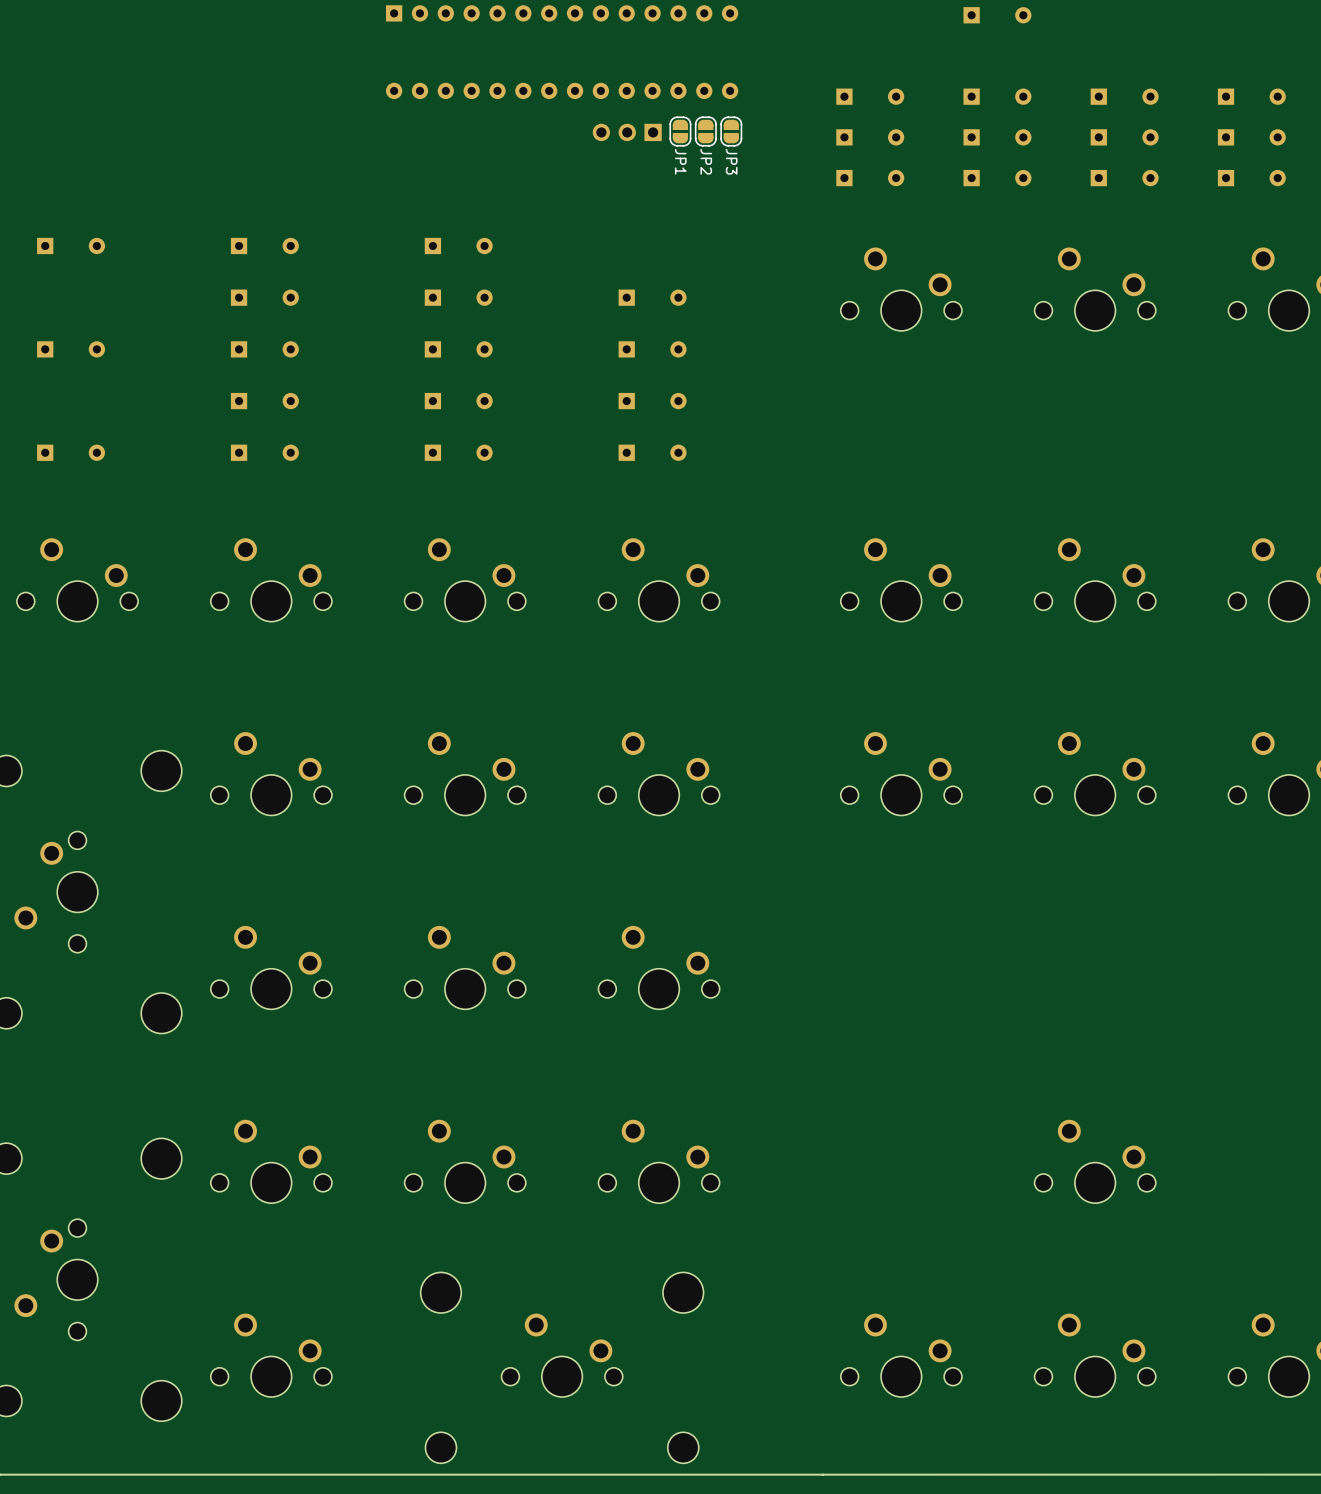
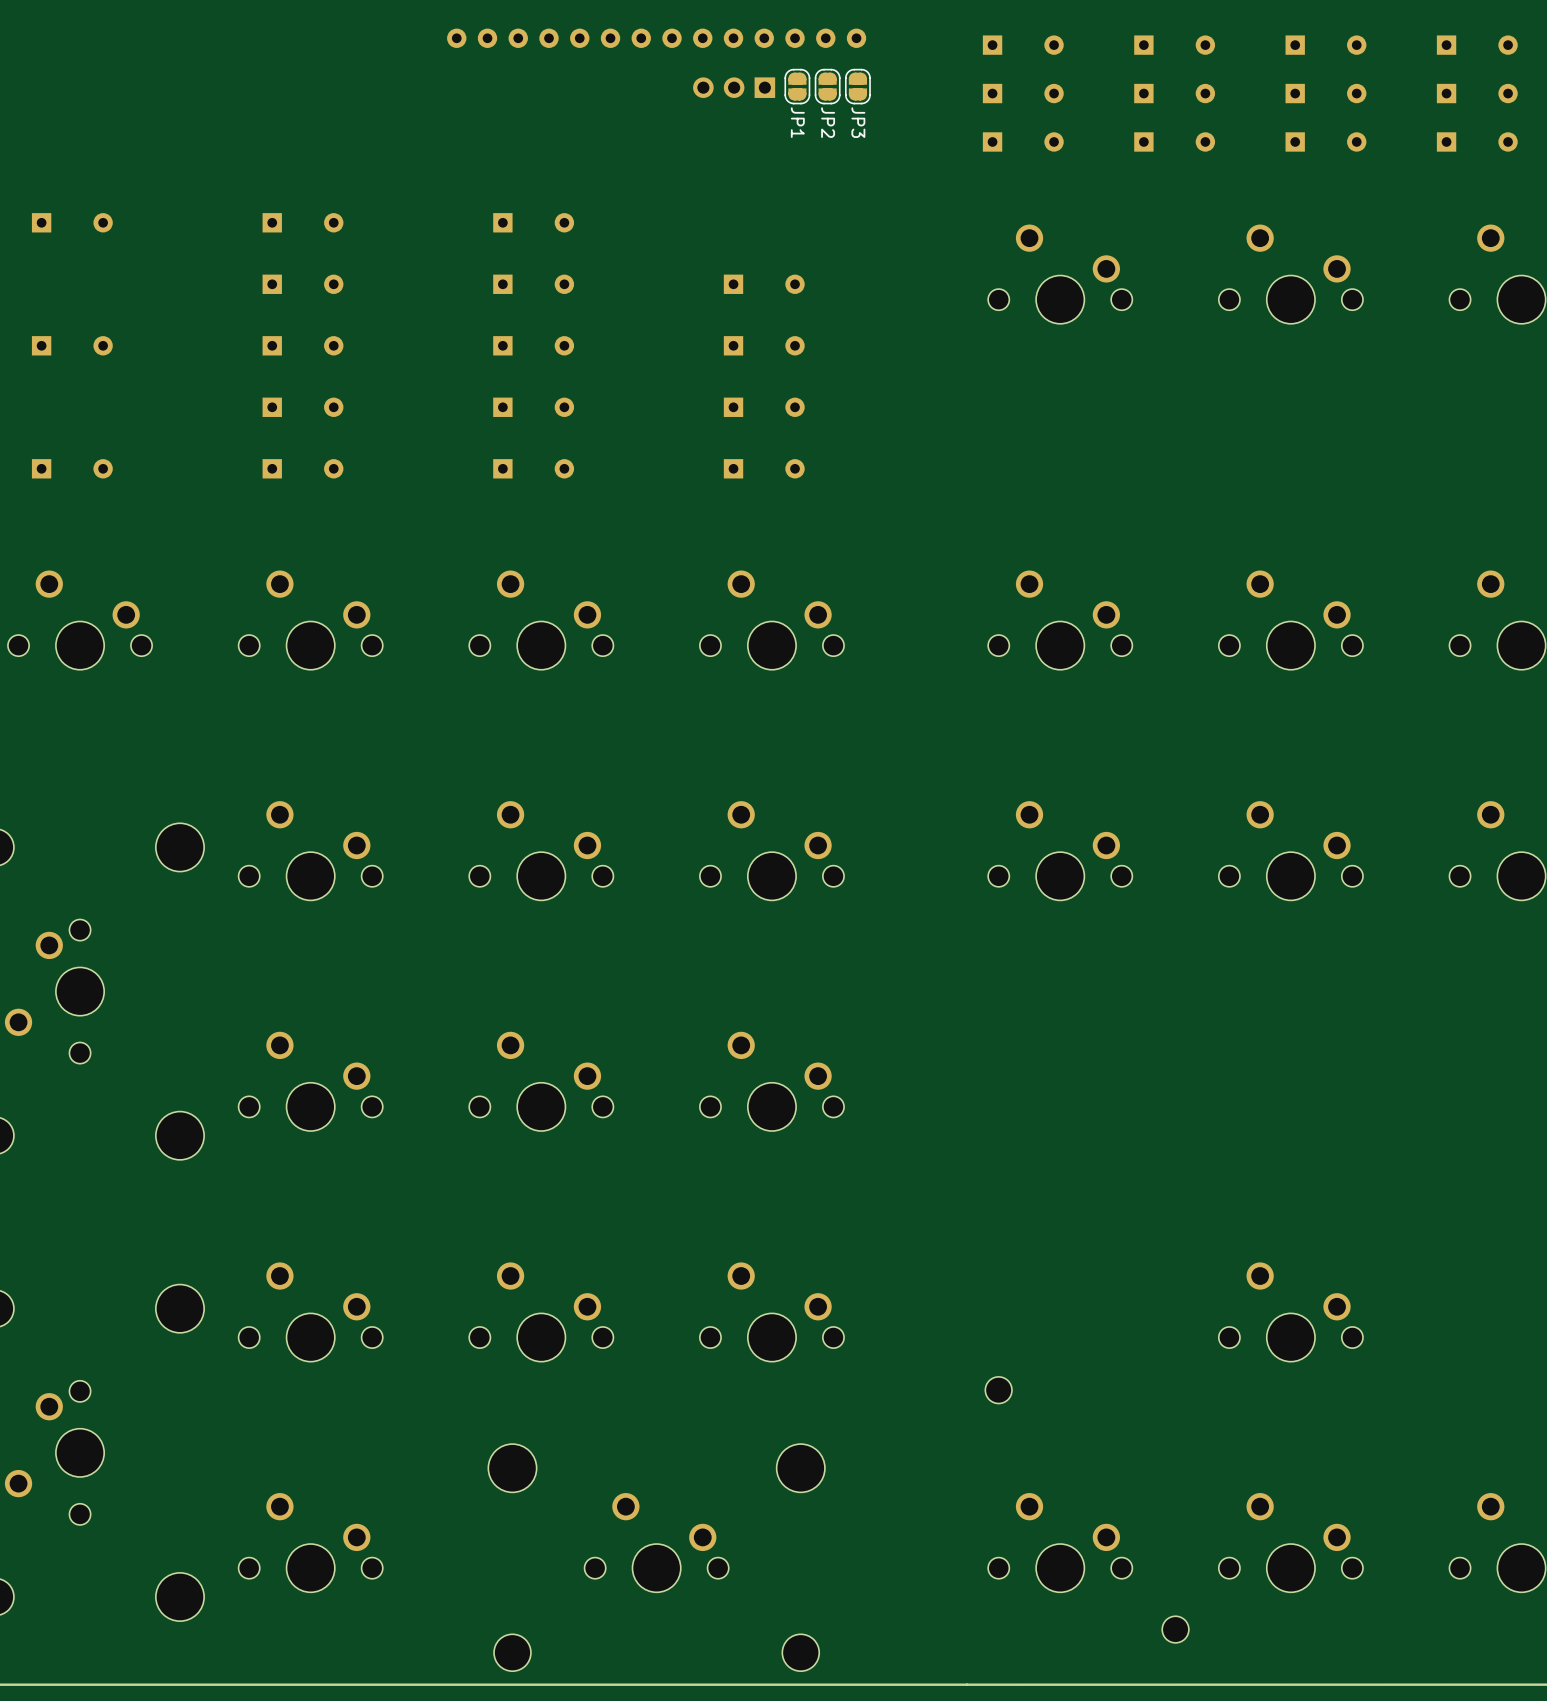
part: none -> (998, 1390)
part: none -> (1175, 1629)

